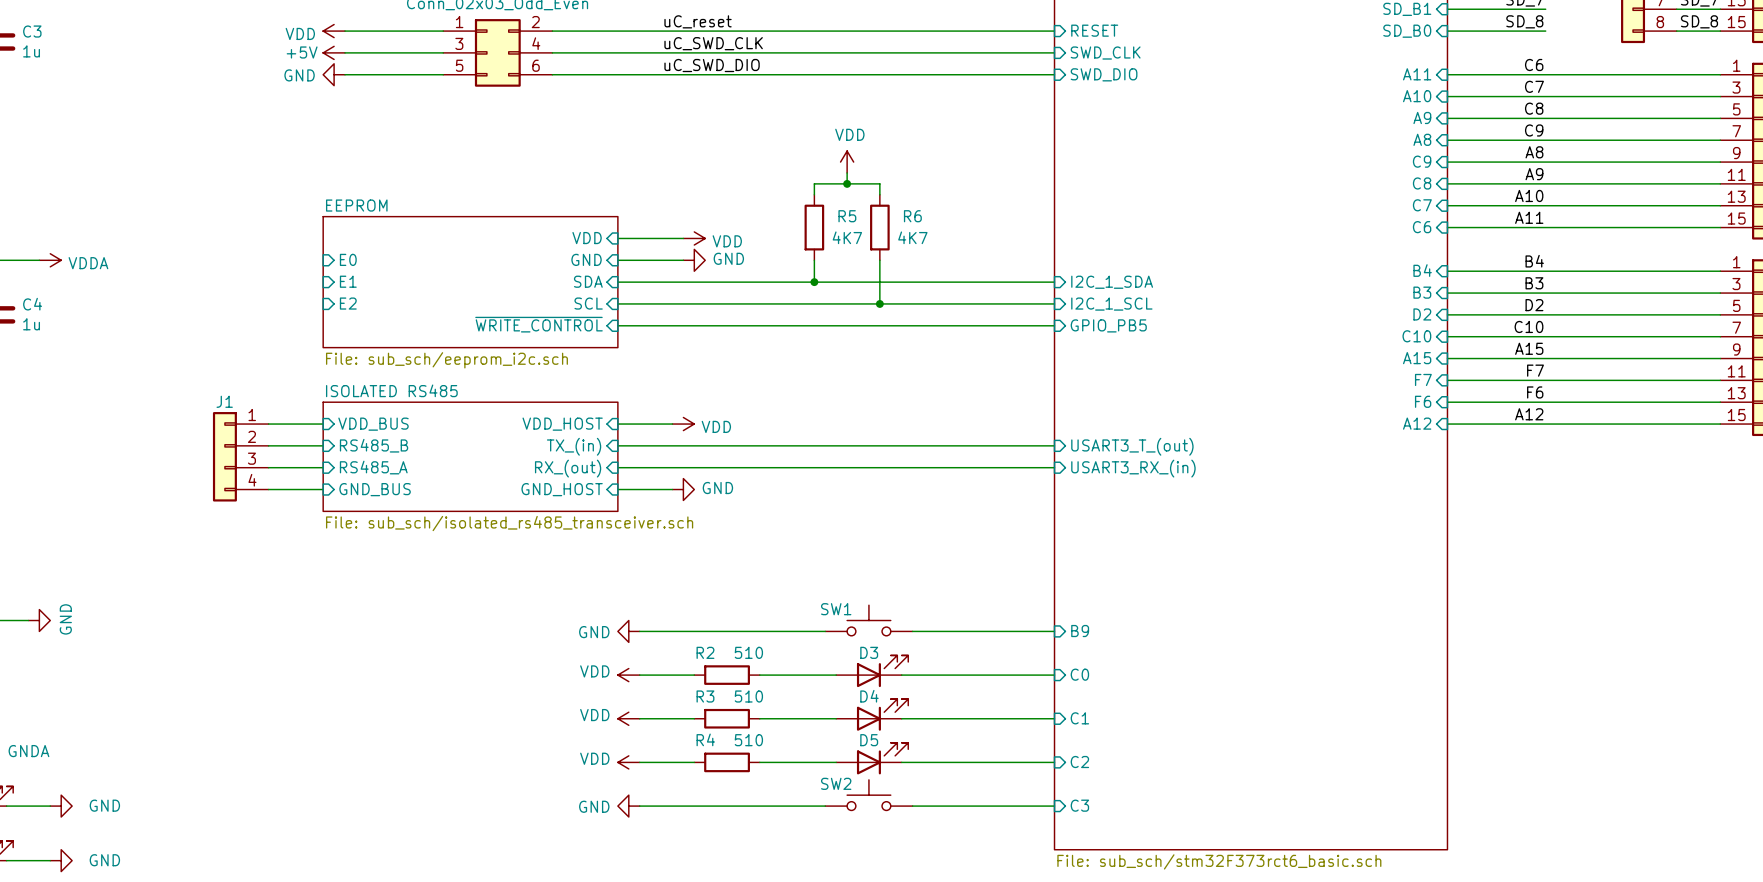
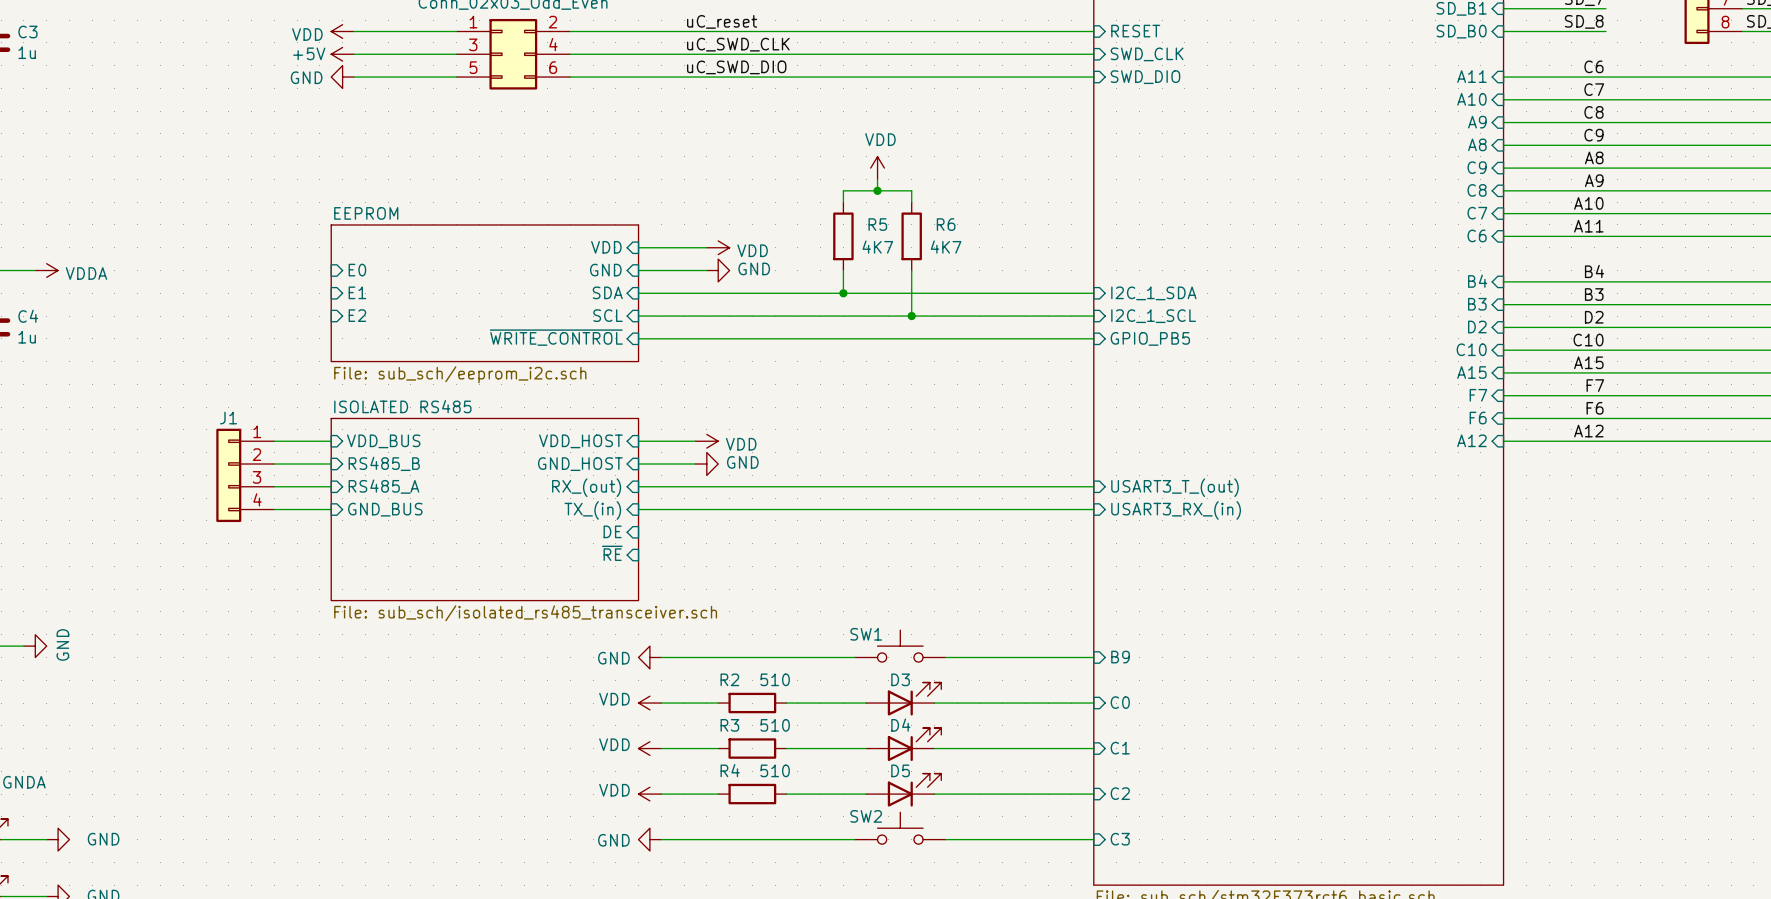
sheet ISOLATED RS485 shape: [323, 402, 618, 512] -> [331, 418, 639, 601]
wire: (672, 445) (1054, 445) -> (695, 509) (1093, 509)
sheet pin: TX_(in) (574, 446) -> GND_HOST (580, 464)
sheet pin: USART3_T_(out) (1132, 446) -> none
sheet pin: USART3_RX_(in) (1133, 468) -> USART3_T_(out) (1175, 487)
sheet pin: GND_HOST (562, 489) -> TX_(in) (592, 510)
power symbol position: GND (683, 489) -> GND (706, 464)
sheet pin: none -> USART3_RX_(in) (1176, 510)
sheet pin: none -> DE (612, 531)
sheet ISOLATED RS485 value position: File: sub_sch/isolated_rs485_transceiver.sch (509, 523) -> File: sub_sch/isolated_rs485_transceiver.sch (525, 613)
sheet pin: none -> ~{RE} (612, 553)

